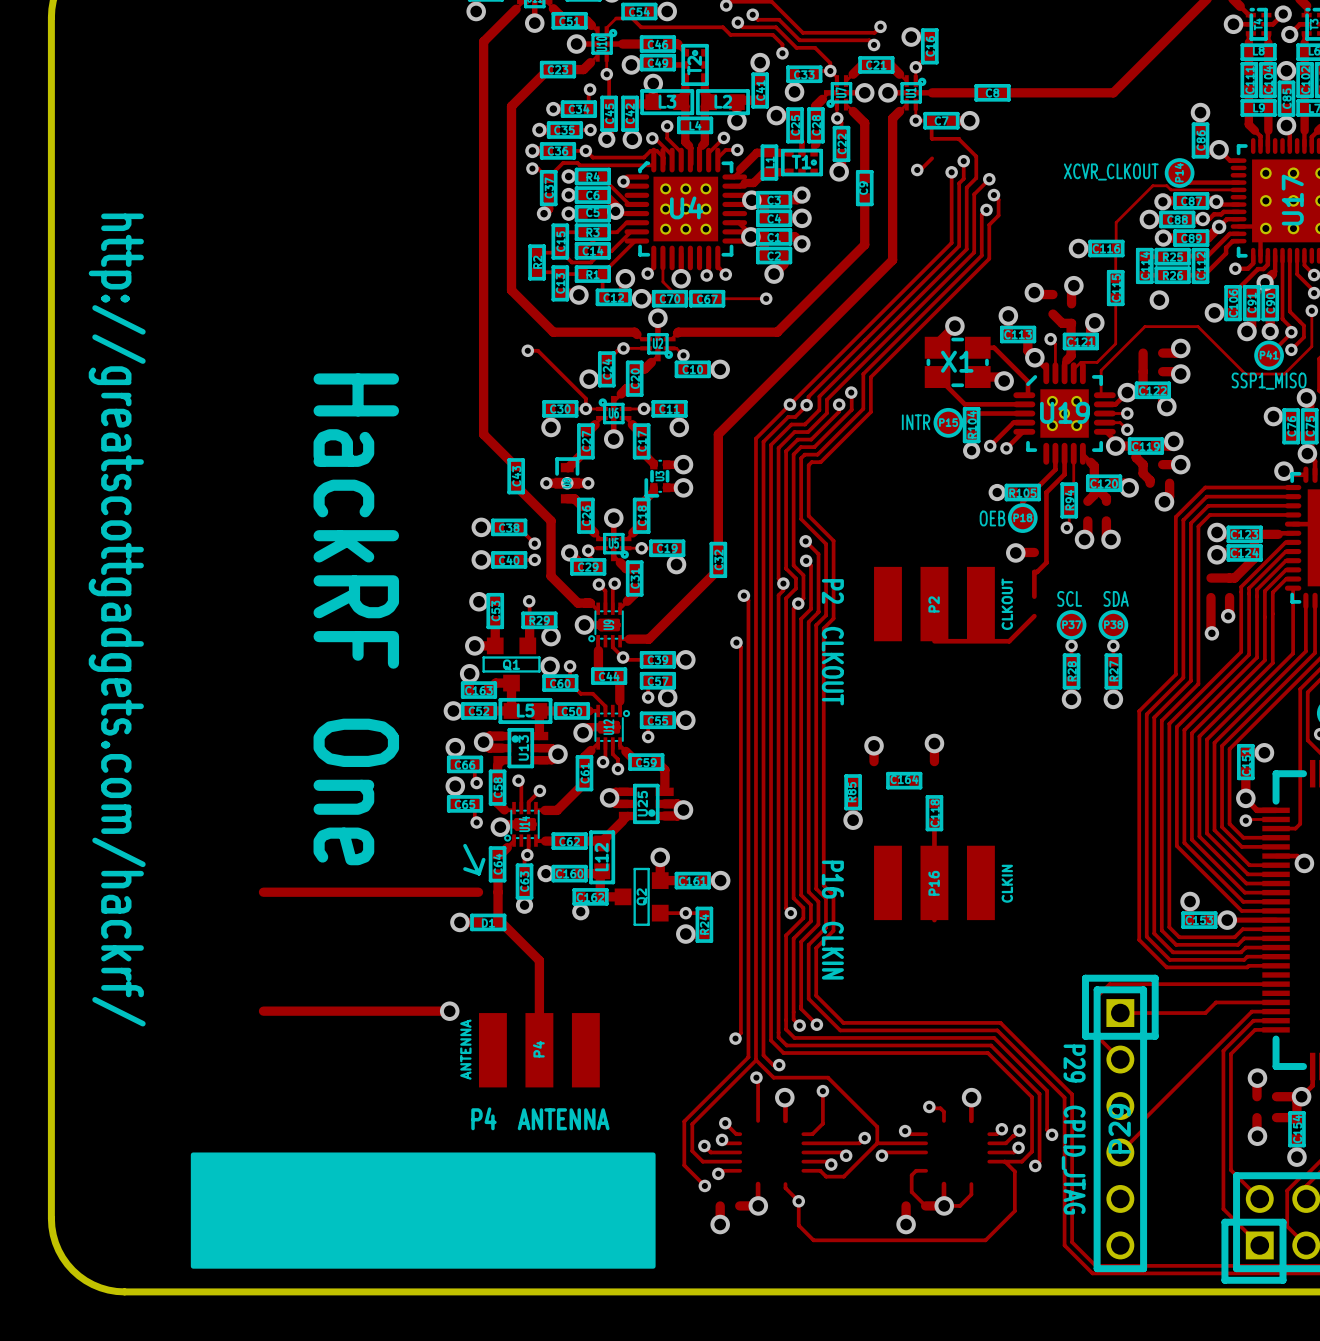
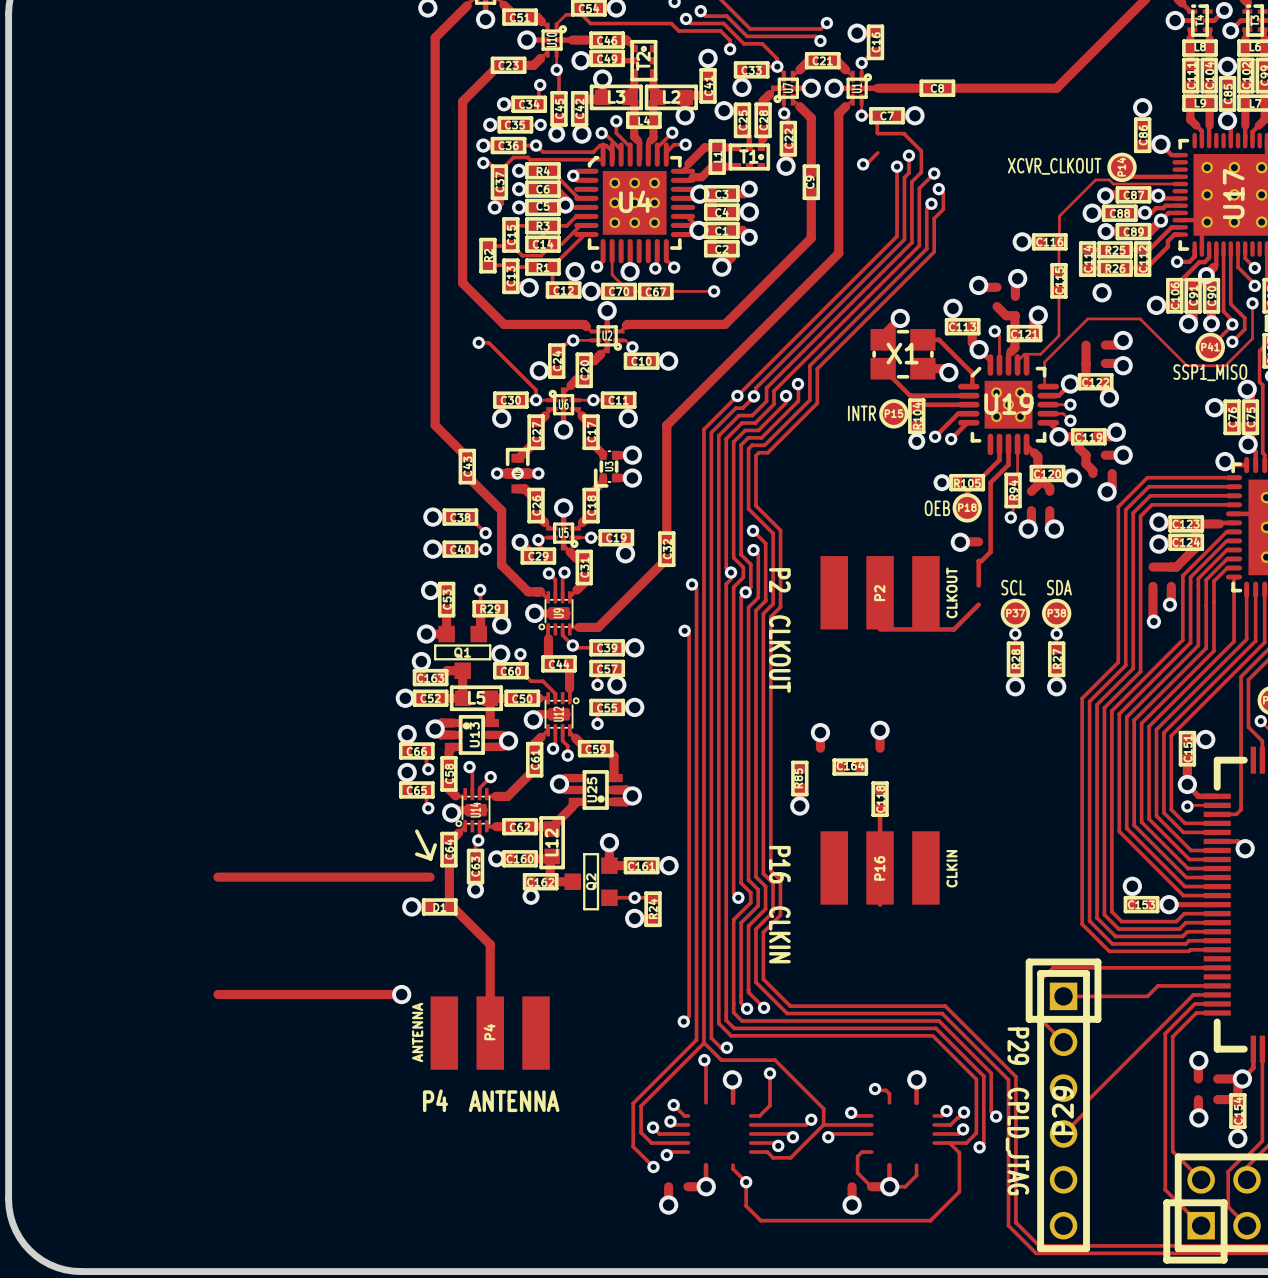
text: HackRF One (356, 619) -> none
text: http://greatscottgadgets.com/hackrf/ (117, 620) -> none
drawing: [190, 1152, 656, 1269] -> none

